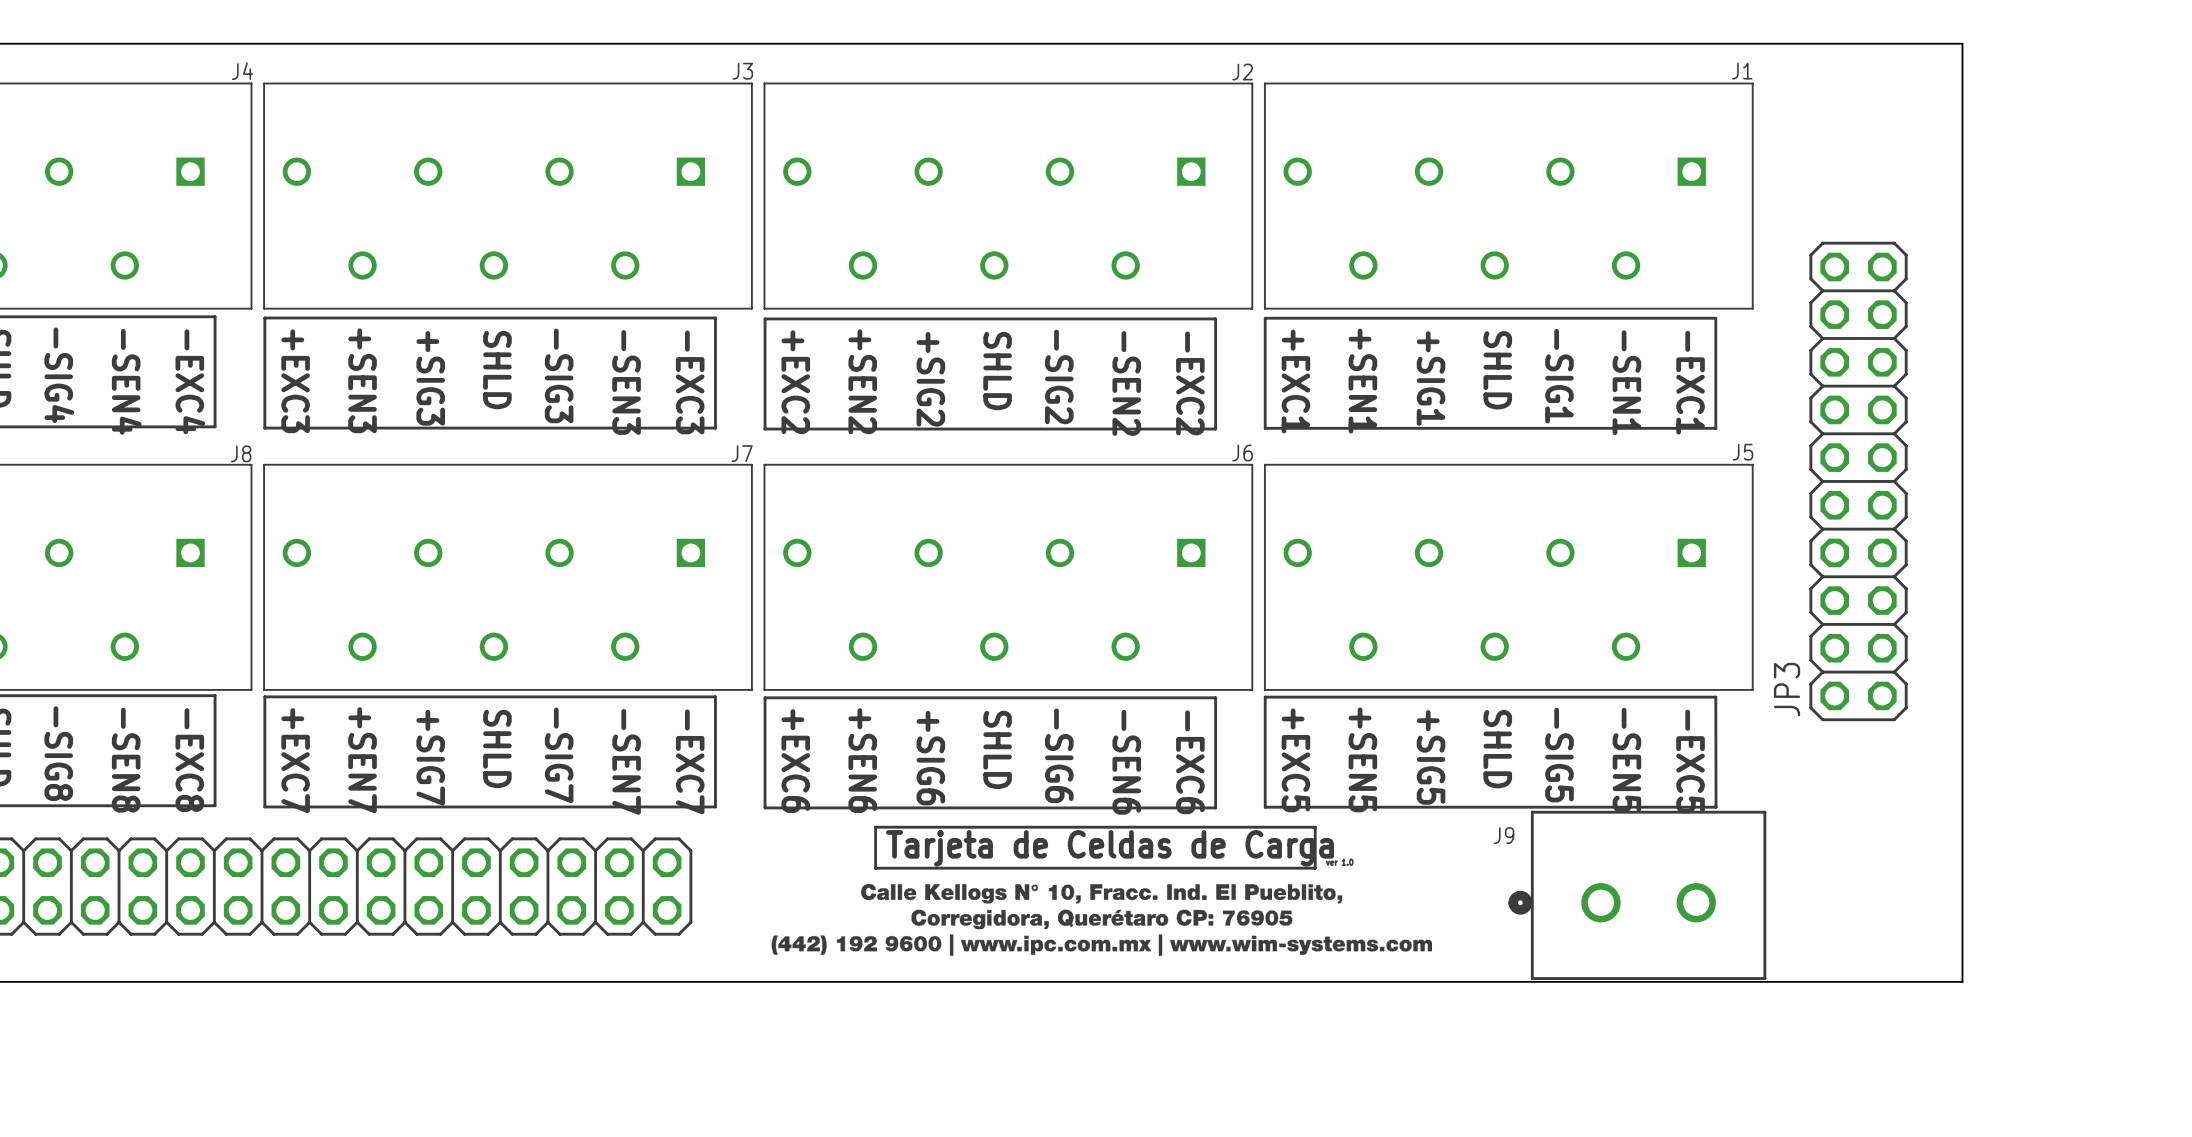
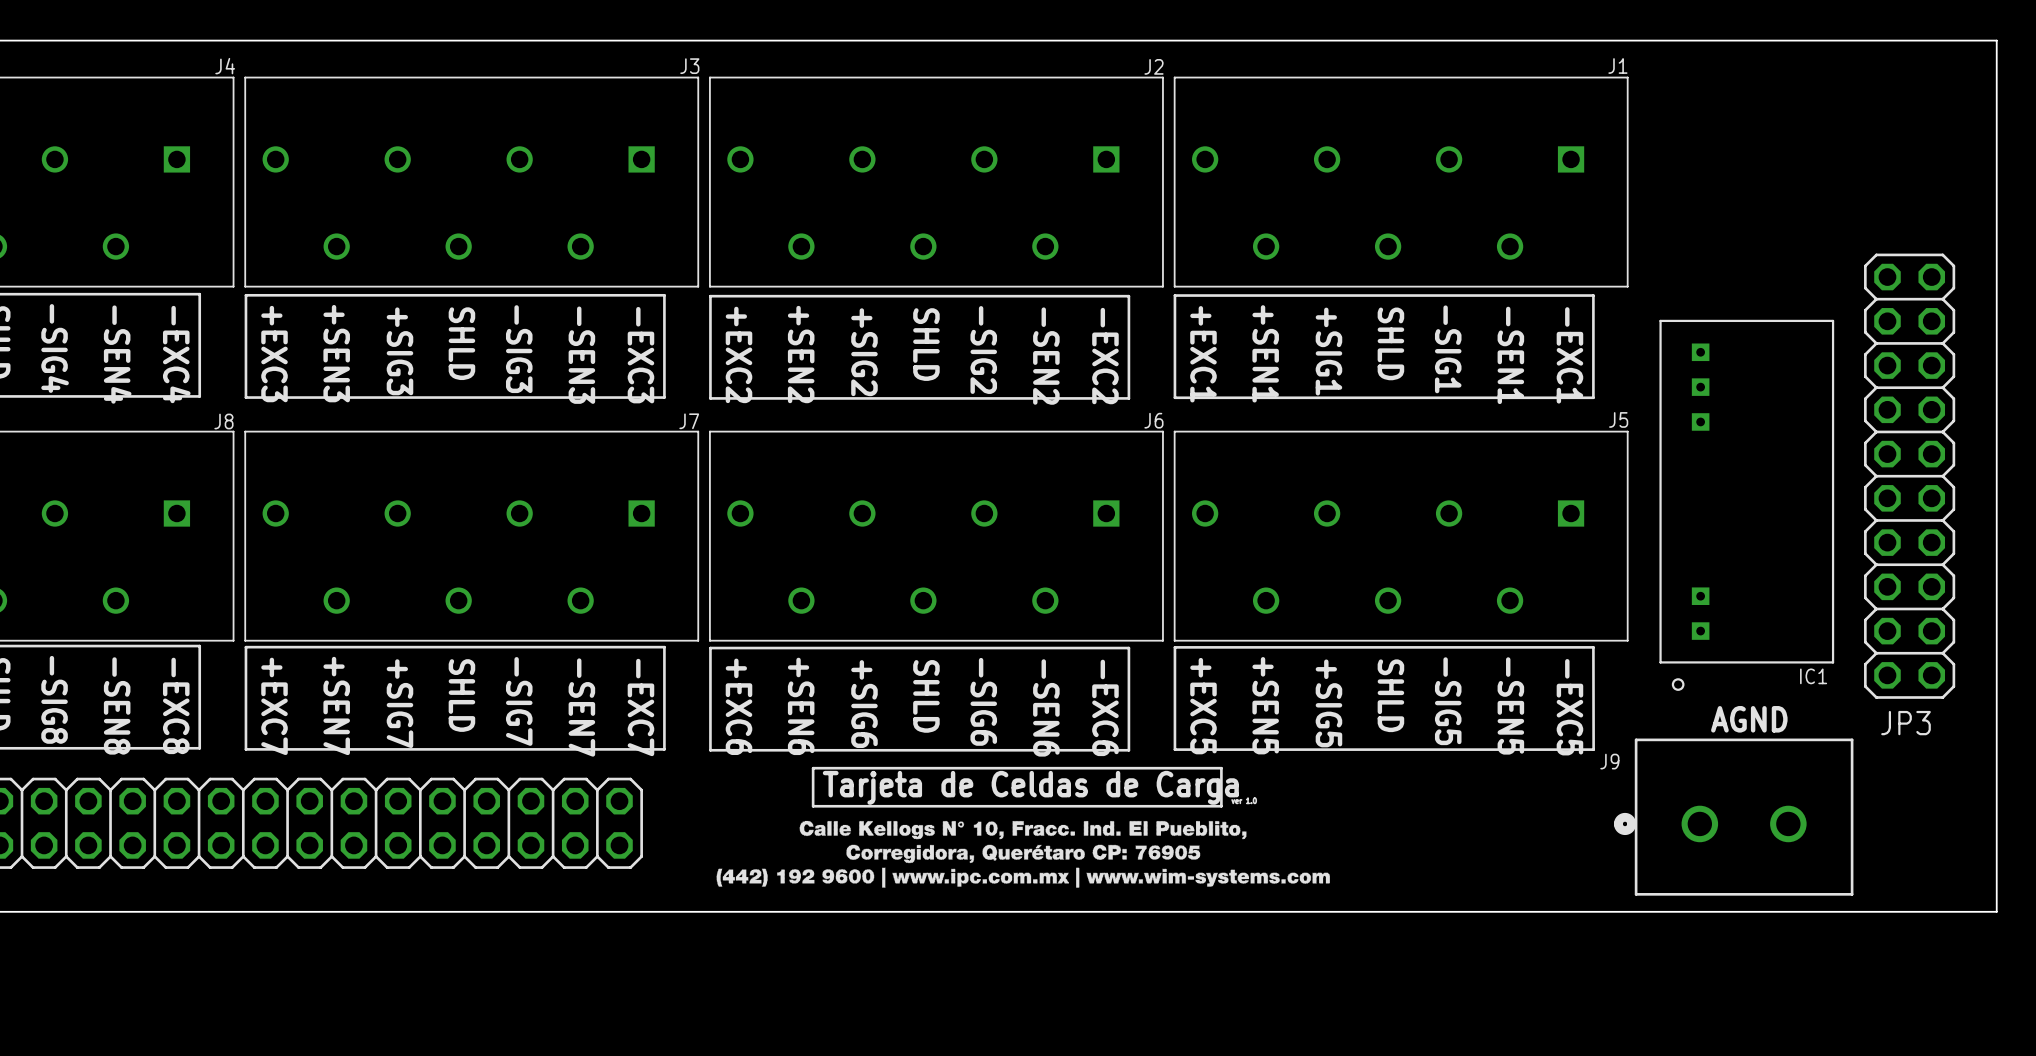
board edge: (1962, 43) (1962, 981) -> (1822, 40) (1996, 40) (1996, 911) (1822, 911)
JP3 position: (1858, 481) -> (1909, 476)
IC1: none -> (1746, 505)
JP3 name rotation: 0° (1787, 689) -> 90° clockwise (1906, 723)
JP3 name position: JP3 (1787, 689) -> JP3 (1906, 723)
text: none -> AGND (1749, 719)
J9 position: (1637, 895) -> (1733, 817)

